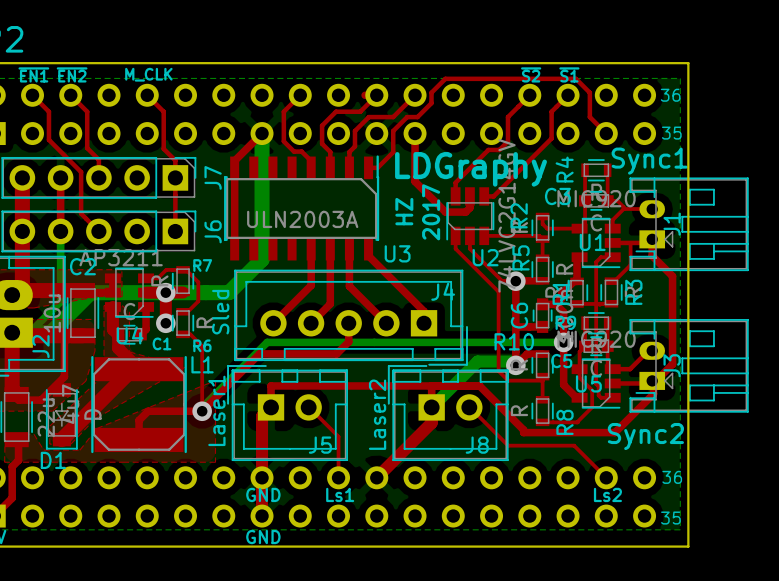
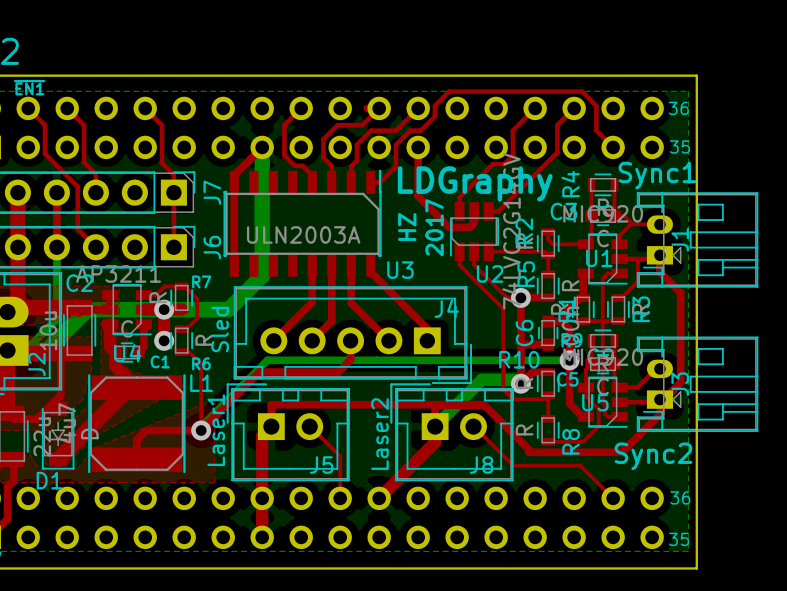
text: ~{EN2} (72, 74) -> none
text: M_CLK (148, 74) -> none
text: ~{S2} (531, 74) -> none
text: ~{S1} (569, 74) -> none
text: GND (263, 494) -> none
text: Ls1 (340, 494) -> none
text: Ls2 (607, 494) -> none
text: GND (263, 537) -> none

